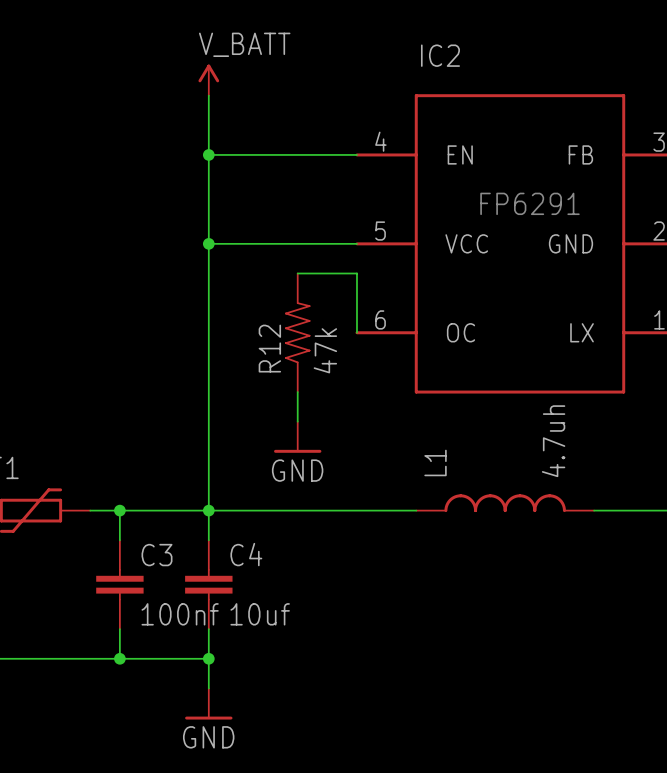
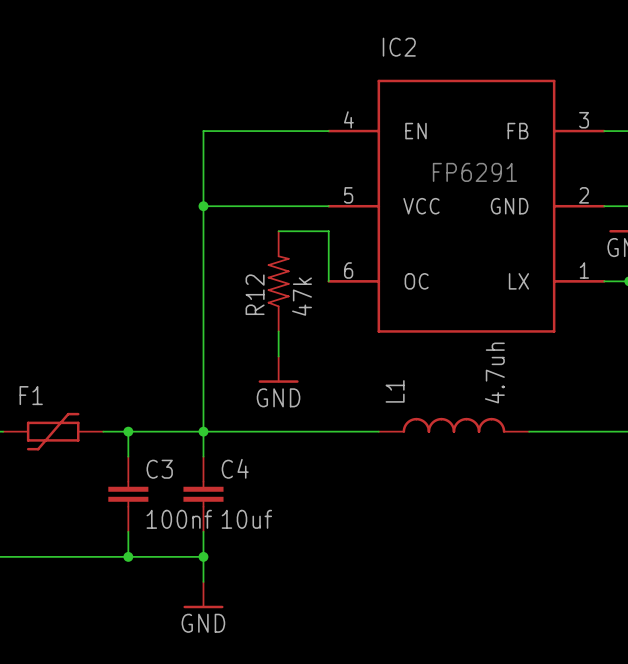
power symbol: V_BATT (208, 80) -> none
wire: (208, 95) (208, 154) -> none
junction: (208, 154) -> none

